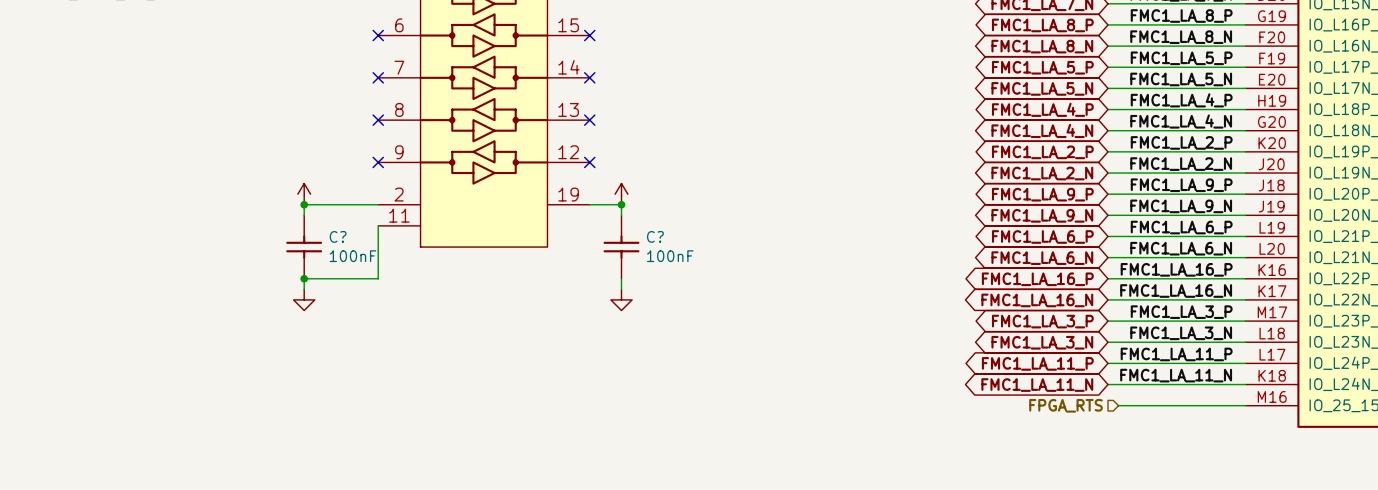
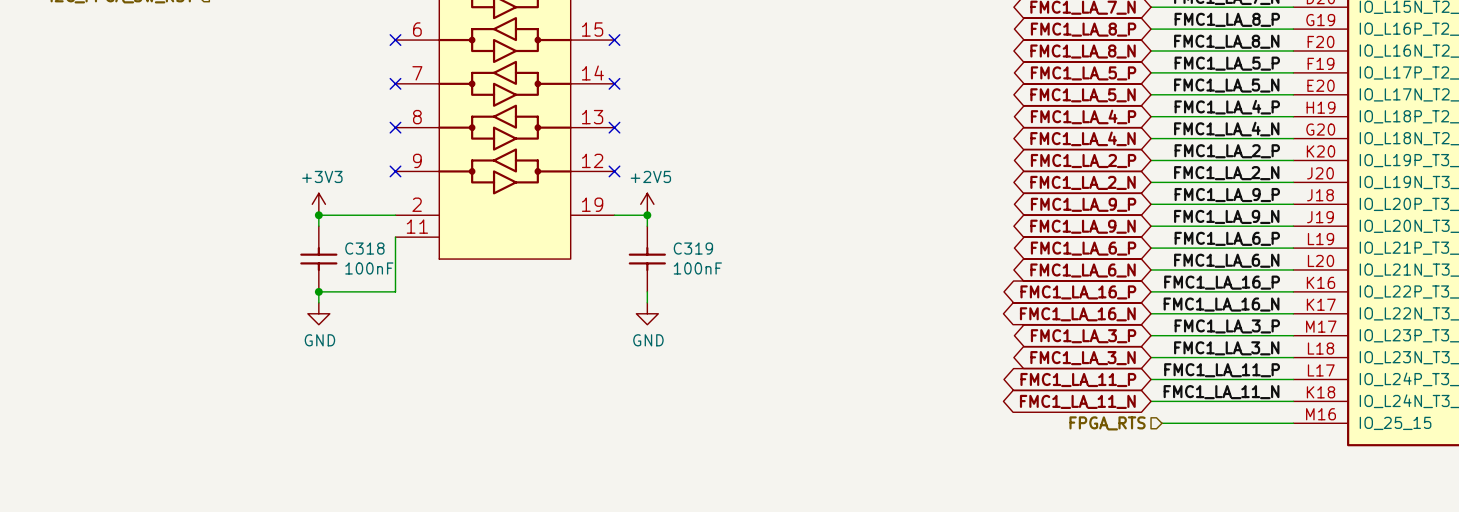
power symbol text: none -> +3V3 (322, 176)
power symbol text: none -> +2V5 (650, 176)
C? name: C? (338, 236) -> C318 (364, 248)
C? name: C? (655, 236) -> C319 (693, 248)
power symbol text: none -> GND (319, 340)
power symbol text: none -> GND (648, 340)

